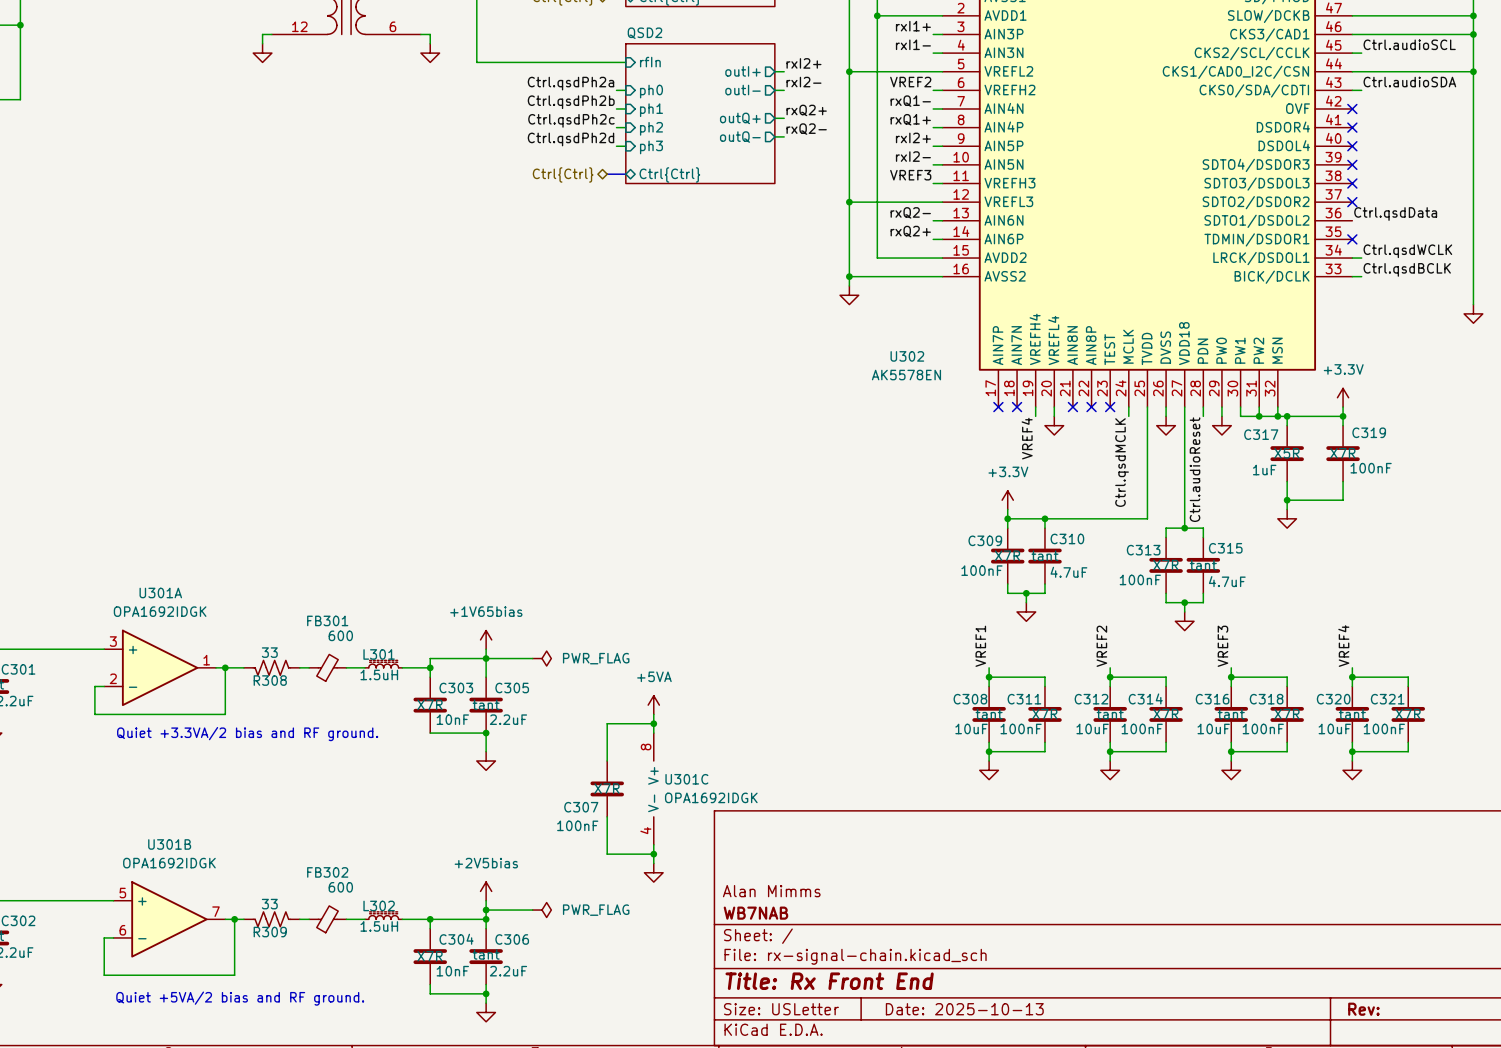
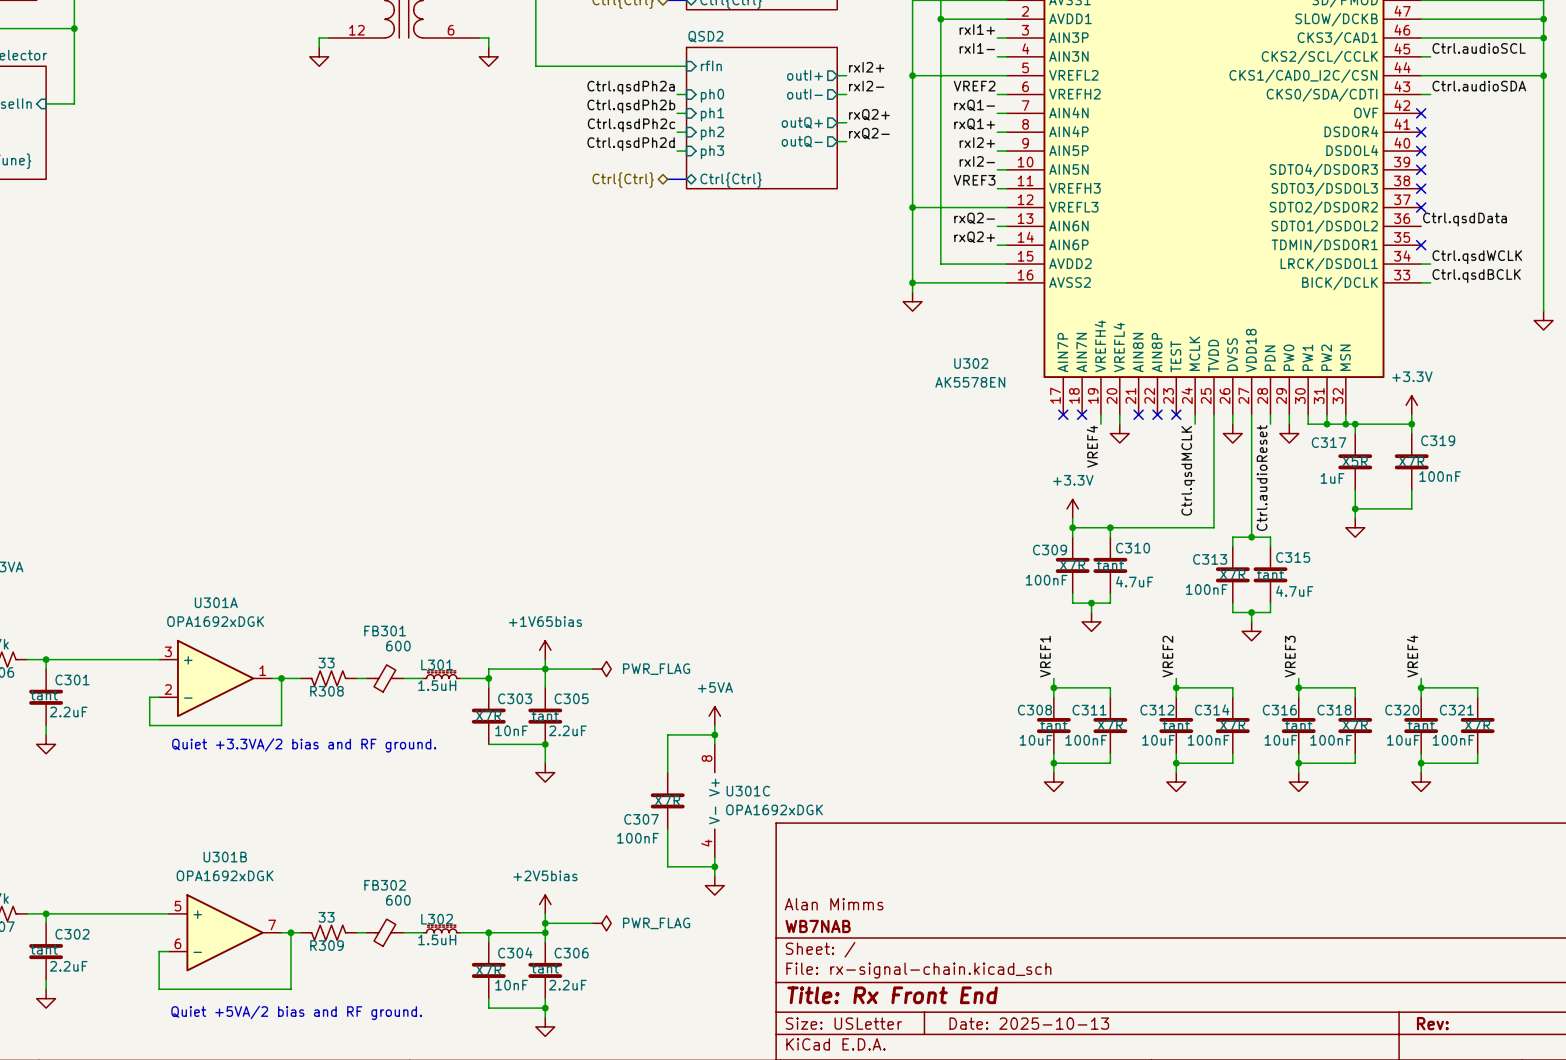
U301A value: OPA1692IDGK (160, 611) -> OPA1692xDGK (215, 621)
U301C value: OPA1692IDGK (711, 797) -> OPA1692xDGK (774, 809)
U301B value: OPA1692IDGK (169, 863) -> OPA1692xDGK (225, 875)

